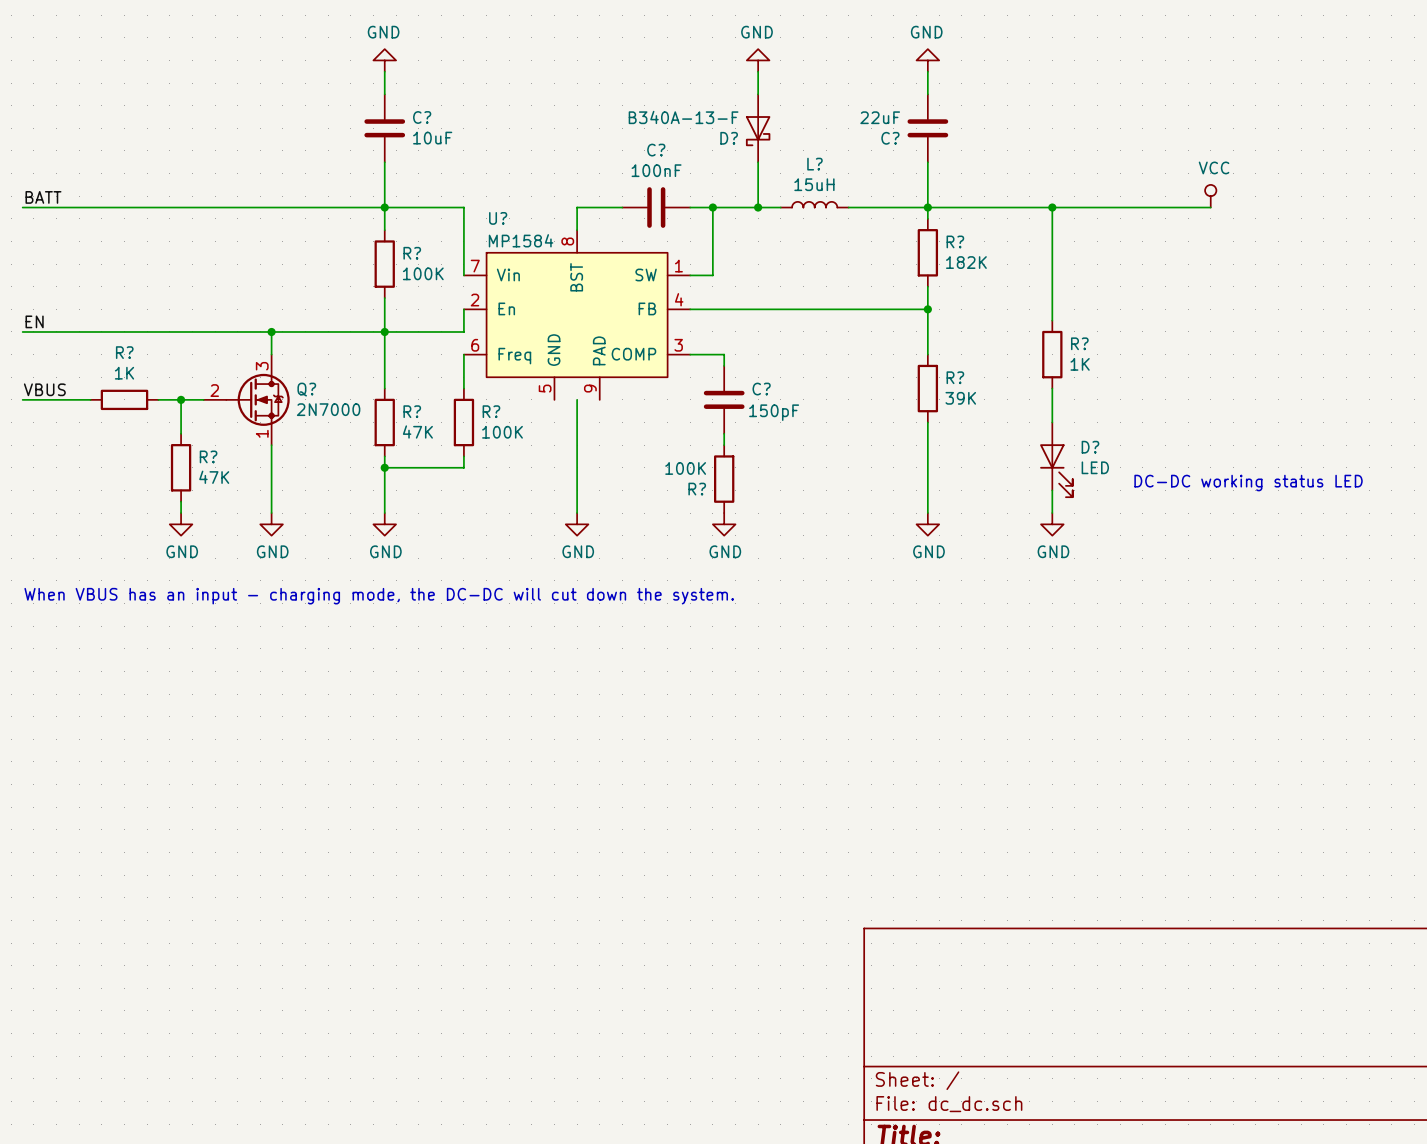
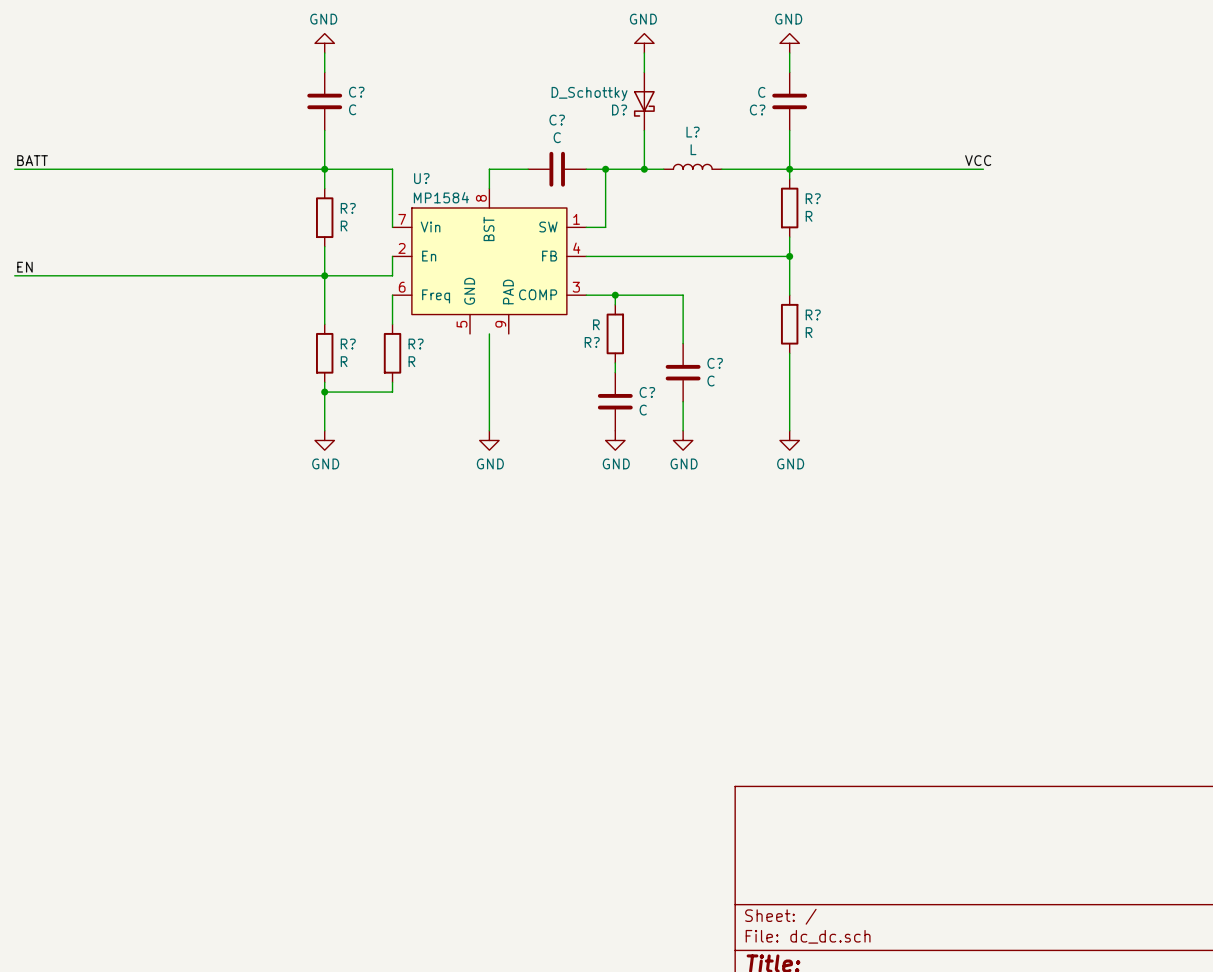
D? value: B340A-13-F (683, 117) -> D_Schottky (589, 93)
C? value: 22uF (880, 117) -> C (761, 92)
C? value: 10uF (432, 138) -> C (352, 109)
C? value: 100nF (656, 170) -> C (557, 137)
L? value: 15uH (814, 184) -> L (693, 149)
power symbol: VCC (1210, 196) -> none
label: none -> VCC (978, 160)
wire: (1052, 207) (1052, 320) -> none
junction: (1052, 207) -> none
wire: (1154, 207) (1210, 207) -> none
R? value: 182K (966, 262) -> R (809, 216)
R? value: 100K (423, 273) -> R (344, 226)
wire: (271, 331) (271, 354) -> none
junction: (271, 331) -> none
wire: none -> (615, 295) (683, 295) (683, 343)
junction: none -> (615, 295)
R?: 1K (1052, 354) -> none
wire: (1052, 388) (1052, 422) -> none
label: VBUS (44, 389) -> none
R? value: 39K (960, 398) -> R (809, 332)
wire: (22, 399) (90, 399) -> none
R?: 1K (124, 399) -> none
wire: (158, 399) (203, 399) -> none
wire: (181, 399) (181, 433) -> none
junction: (181, 399) -> none
Q?: 2N7000 (246, 399) -> none
C?: 150pF (724, 399) -> none
R?: none -> R (615, 333)
R? value: 47K (417, 432) -> R (344, 361)
R? value: 100K (502, 432) -> R (411, 361)
wire: (271, 445) (271, 513) -> none
C?: none -> C (683, 372)
D?: LED (1056, 459) -> none
R?: 47K (181, 467) -> none
R?: 100K (724, 479) -> none
C?: none -> C (615, 401)
wire: none -> (683, 401) (683, 430)
text: DC-DC working status LED (1248, 483) -> none
wire: (1052, 490) (1052, 513) -> none
wire: (181, 501) (181, 513) -> none
power symbol: GND (181, 524) -> none
power symbol: GND (271, 524) -> none
power symbol: none -> GND (683, 440)
power symbol: GND (1052, 524) -> none
text: When VBUS has an input - charging mode, the DC-DC will cut down the system. (379, 596) -> none

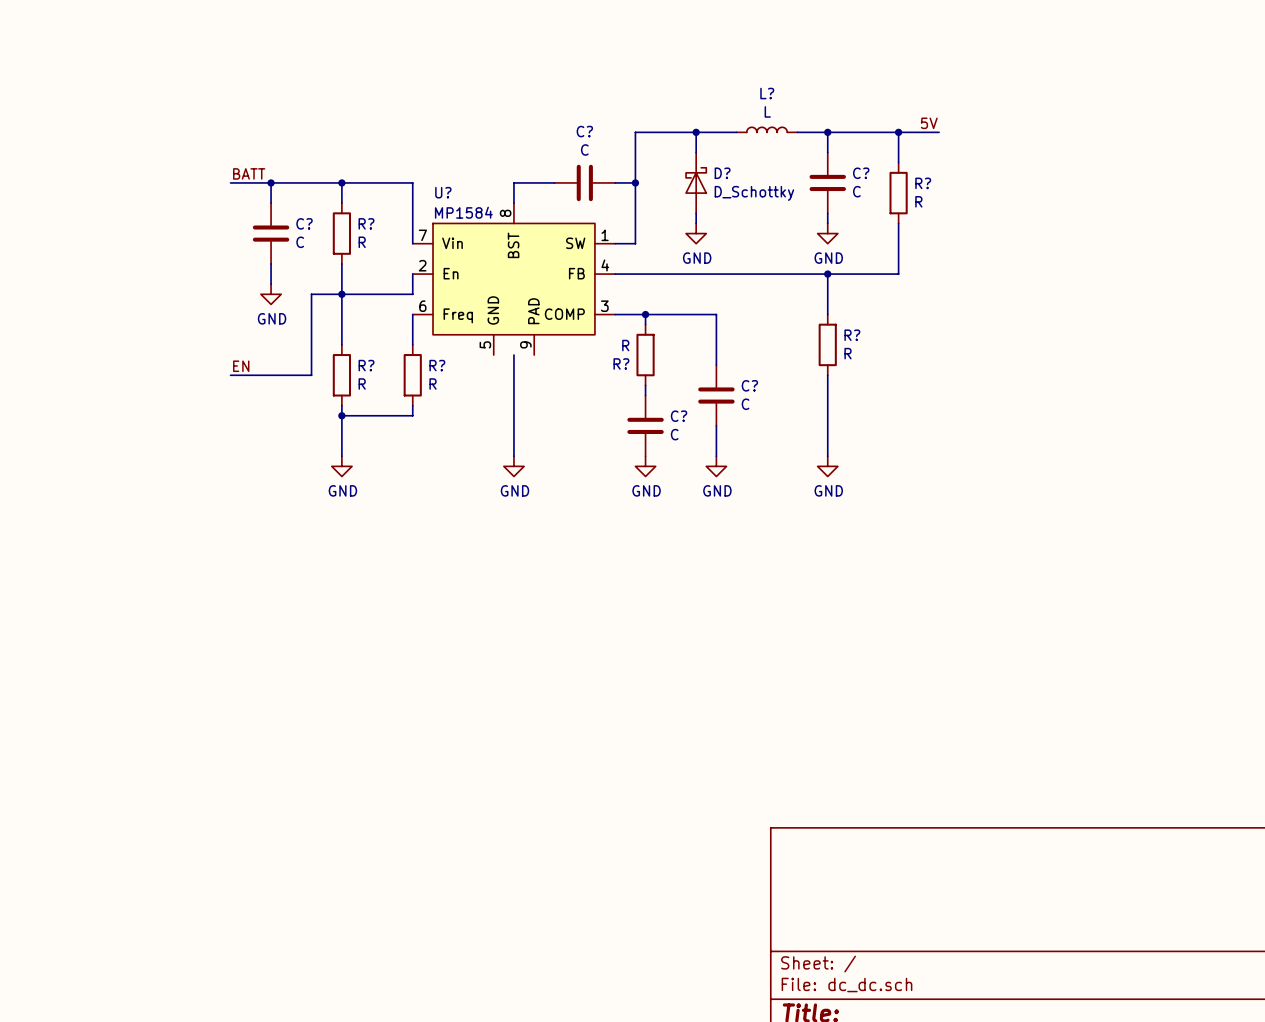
power symbol: GND (324, 43) -> none
power symbol: GND (644, 43) -> none
power symbol: GND (789, 43) -> none
wire: (324, 53) (324, 72) -> (271, 182) (271, 203)
wire: (644, 53) (644, 72) -> (696, 132) (696, 152)
wire: (789, 53) (789, 72) -> none
C? value position: C (761, 92) -> C (856, 191)
C? position: (324, 101) -> (271, 233)
D? position: (644, 101) -> (696, 182)
C? position: (789, 101) -> (827, 182)
D? rotation: 0° (644, 103) -> 180° (696, 180)
C? name position: C? (757, 109) -> C? (861, 173)
label: none -> 5V (929, 123)
junction: none -> (696, 132)
wire: none -> (797, 132) (939, 132)
junction: none -> (827, 132)
wire: none -> (898, 132) (898, 162)
junction: none -> (898, 132)
wire: (324, 130) (324, 169) -> none
wire: (644, 130) (644, 169) -> none
label: BATT (32, 160) -> none
label: none -> BATT (249, 173)
label: VCC (978, 160) -> none
L? position: (692, 166) -> (767, 129)
wire: (14, 169) (218, 169) -> none
junction: none -> (271, 182)
wire: (605, 169) (663, 169) -> (635, 182) (635, 132) (736, 132)
junction: (644, 169) -> none
wire: (721, 169) (983, 169) -> none
junction: (789, 169) -> none
wire: none -> (696, 213) (696, 223)
wire: none -> (827, 213) (827, 223)
R? position: (789, 208) -> (898, 193)
power symbol: none -> GND (696, 233)
power symbol: none -> GND (827, 233)
wire: (789, 237) (789, 256) -> (898, 223) (898, 274) (827, 274)
wire: none -> (271, 263) (271, 284)
label: EN (24, 267) -> none
wire: (14, 275) (295, 275) -> (230, 375) (311, 375) (311, 294)
power symbol: none -> GND (271, 294)
label: none -> EN (241, 366)

